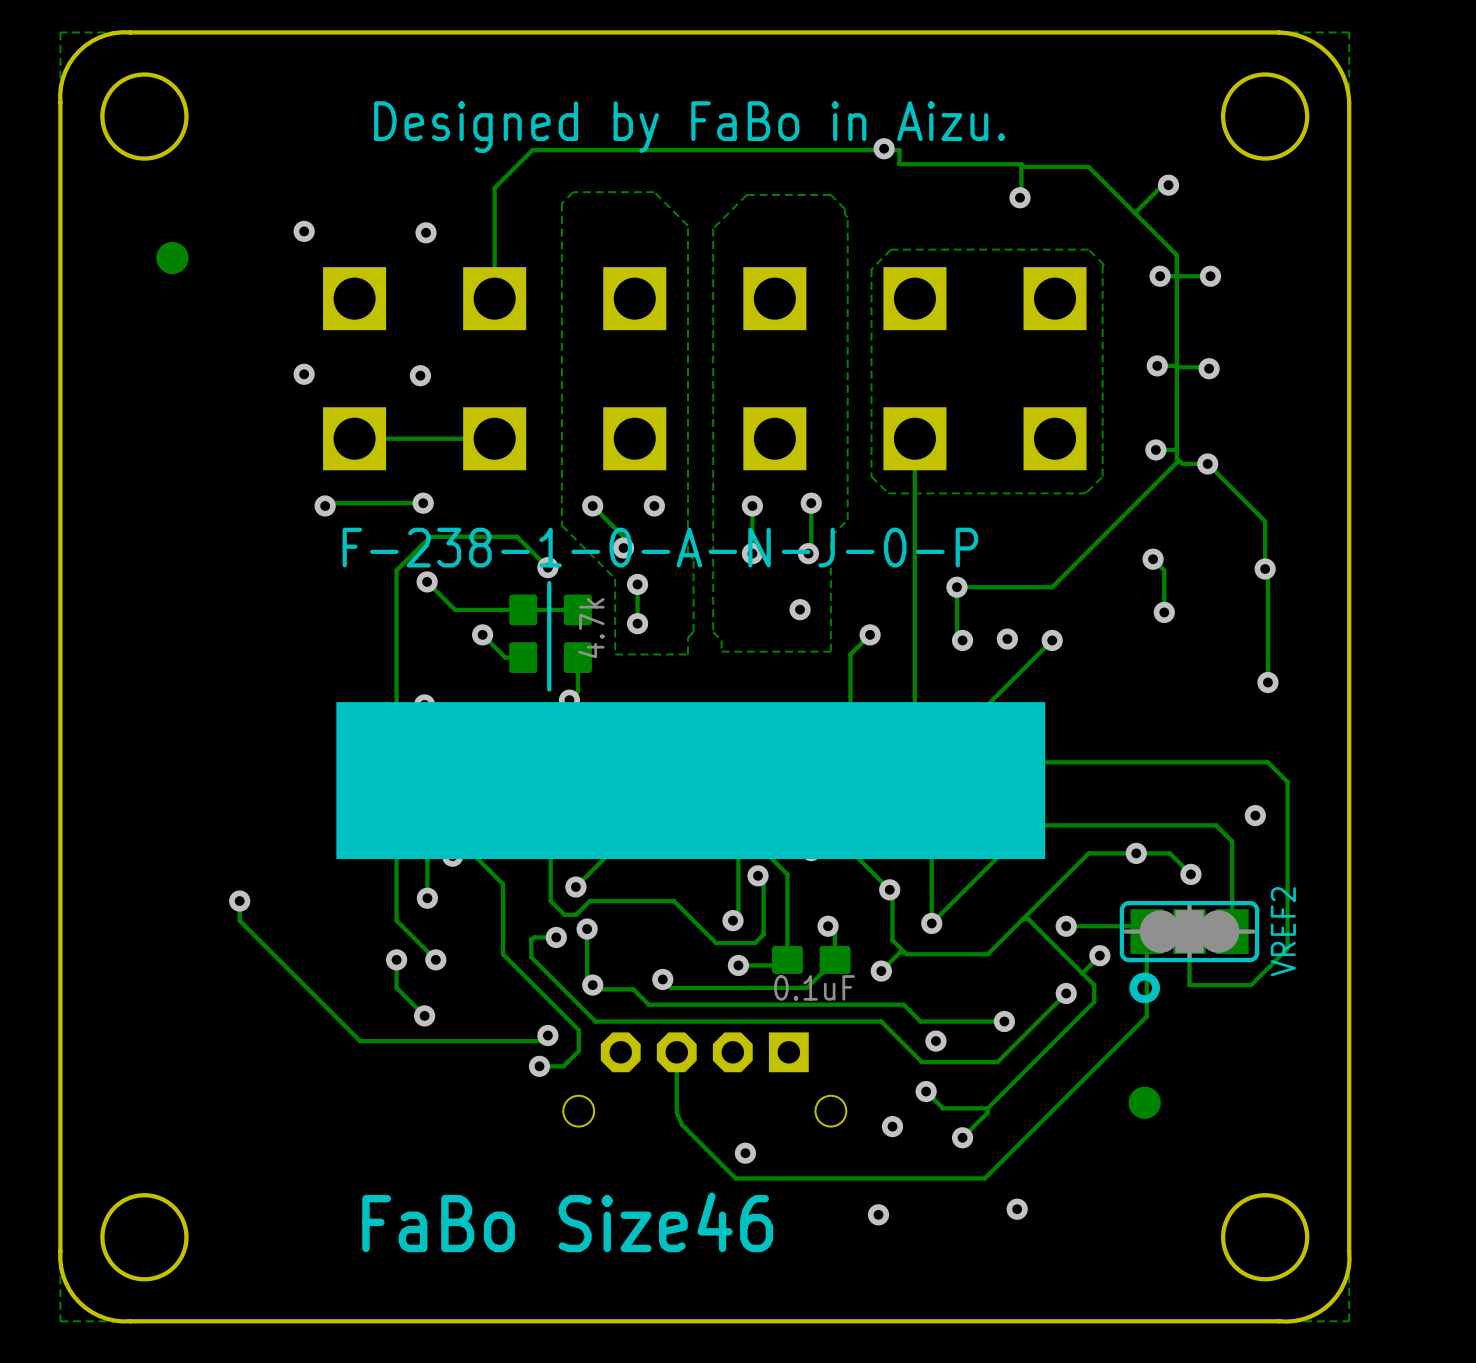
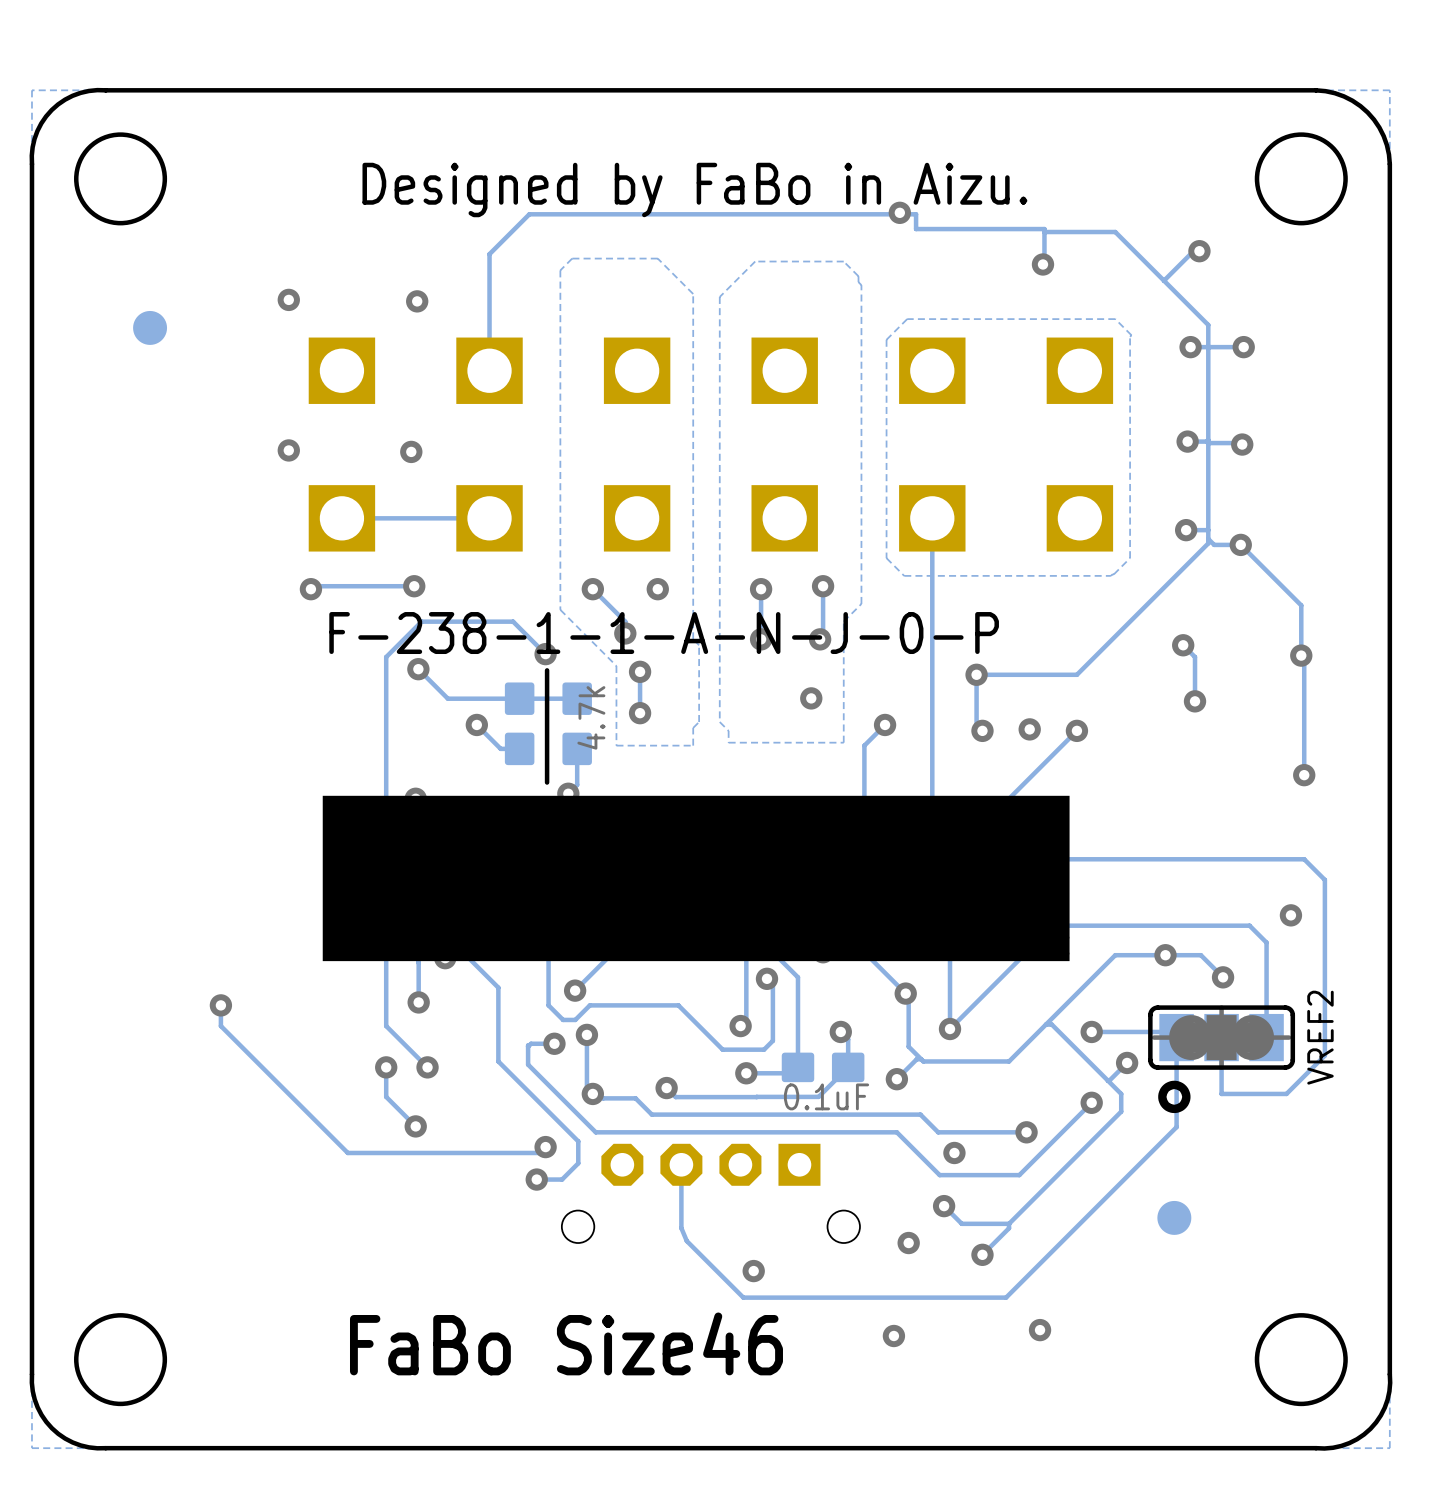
text: F-238-1-0-A-N-J-0-P (660, 547) -> F-238-1-1-A-N-J-0-P (664, 633)

